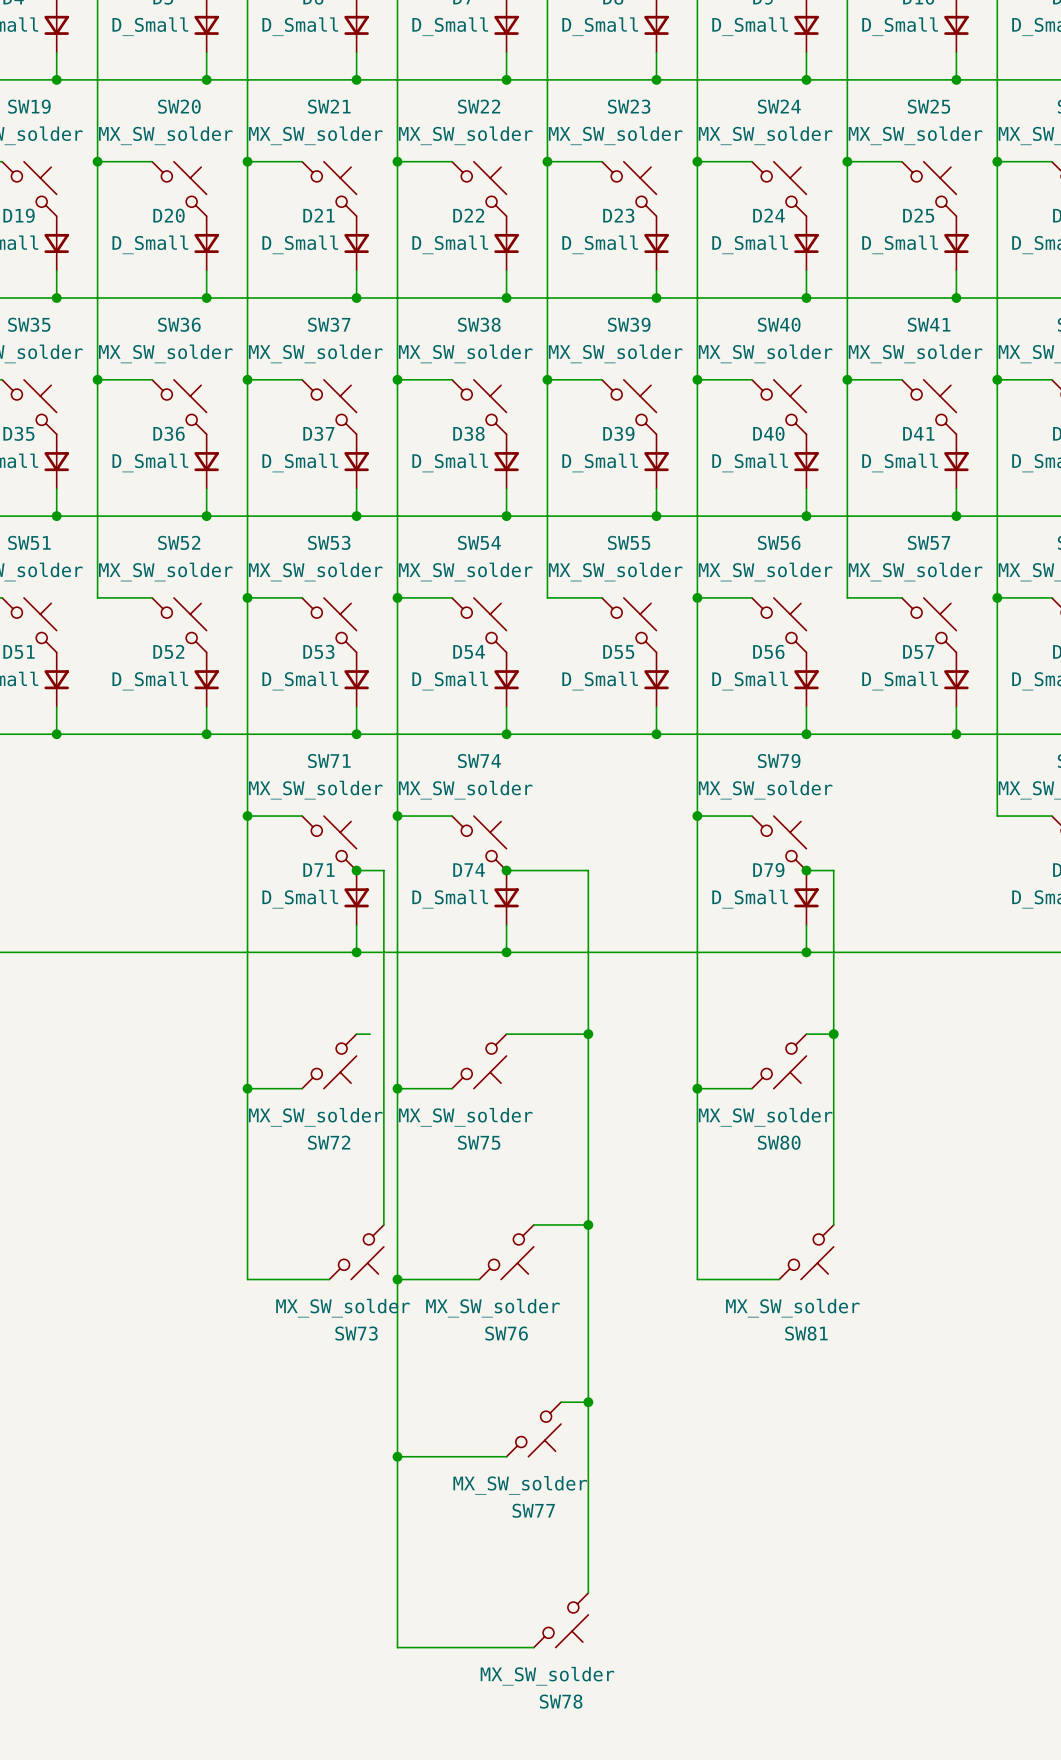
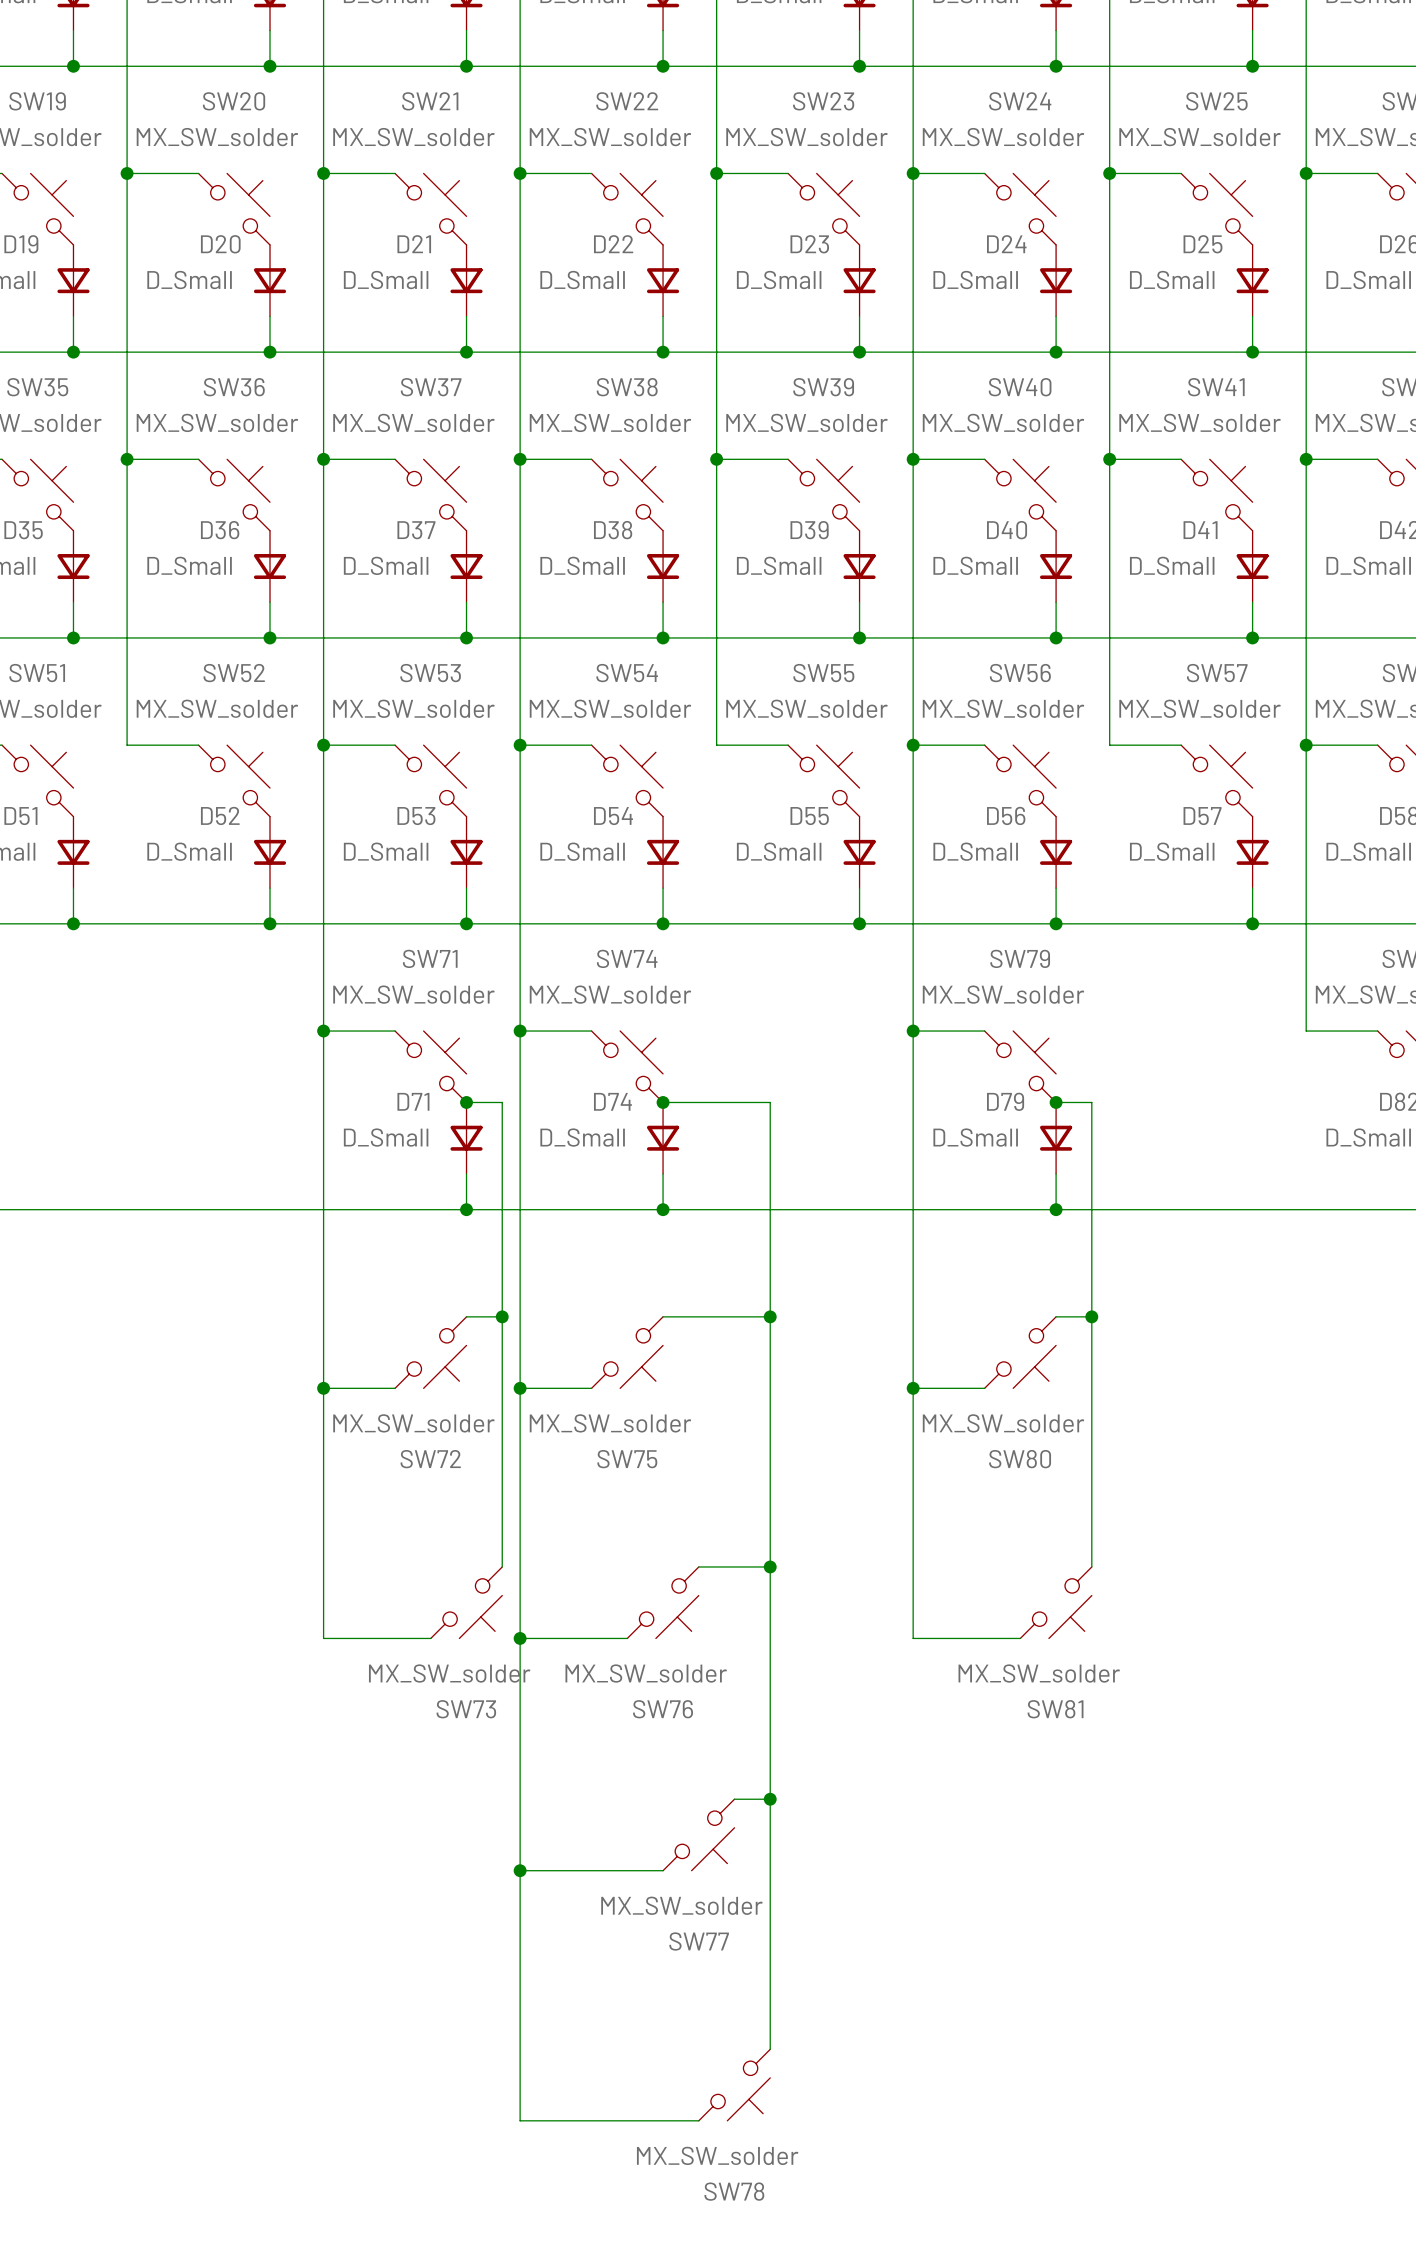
wire: none -> (484, 1316) (502, 1316)
junction: none -> (502, 1316)

